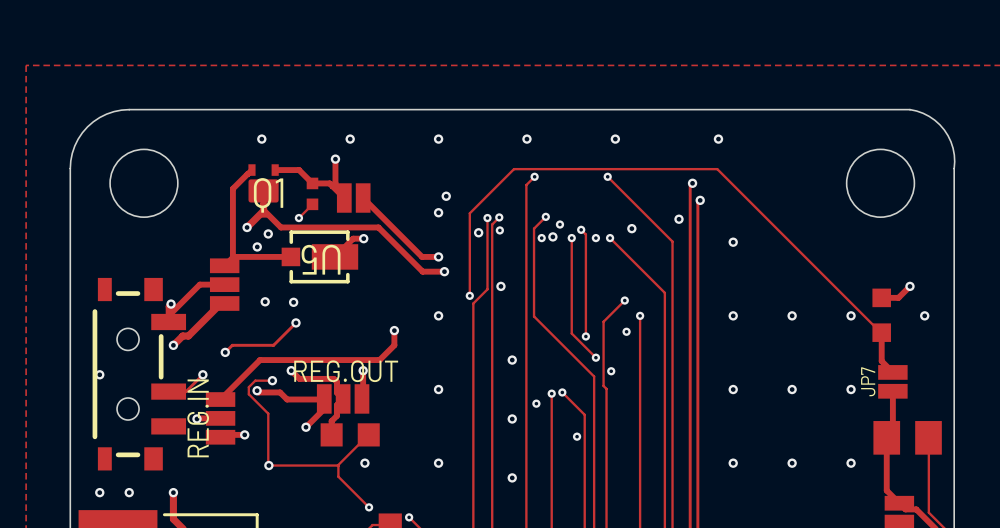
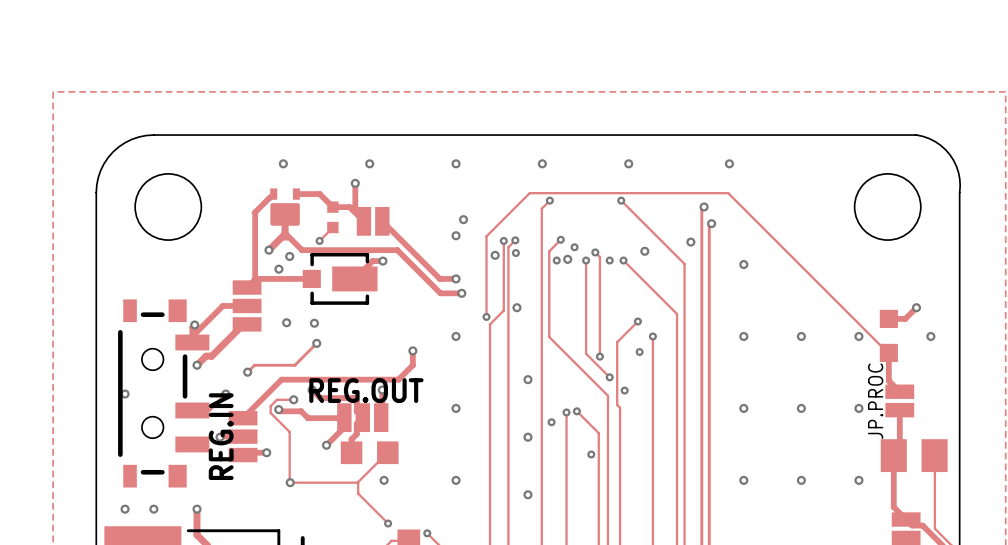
Q1 name: Q1 (268, 195) -> none
U5 name: U5 (321, 259) -> none
JP7 name: JP7 (868, 381) -> JP.PROC (875, 401)

